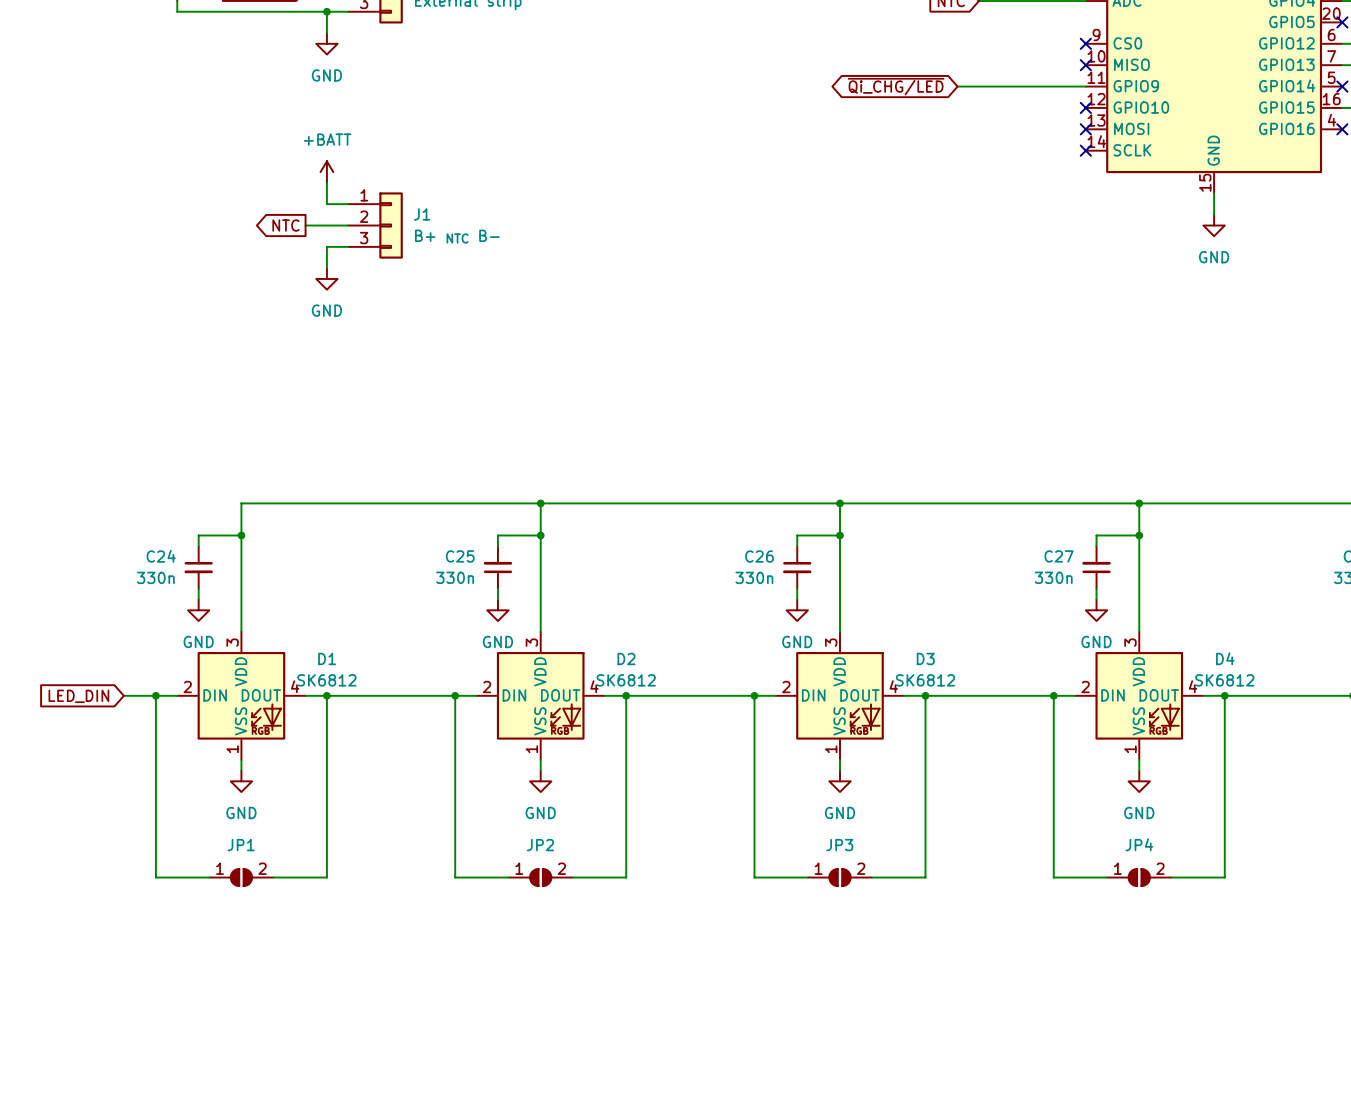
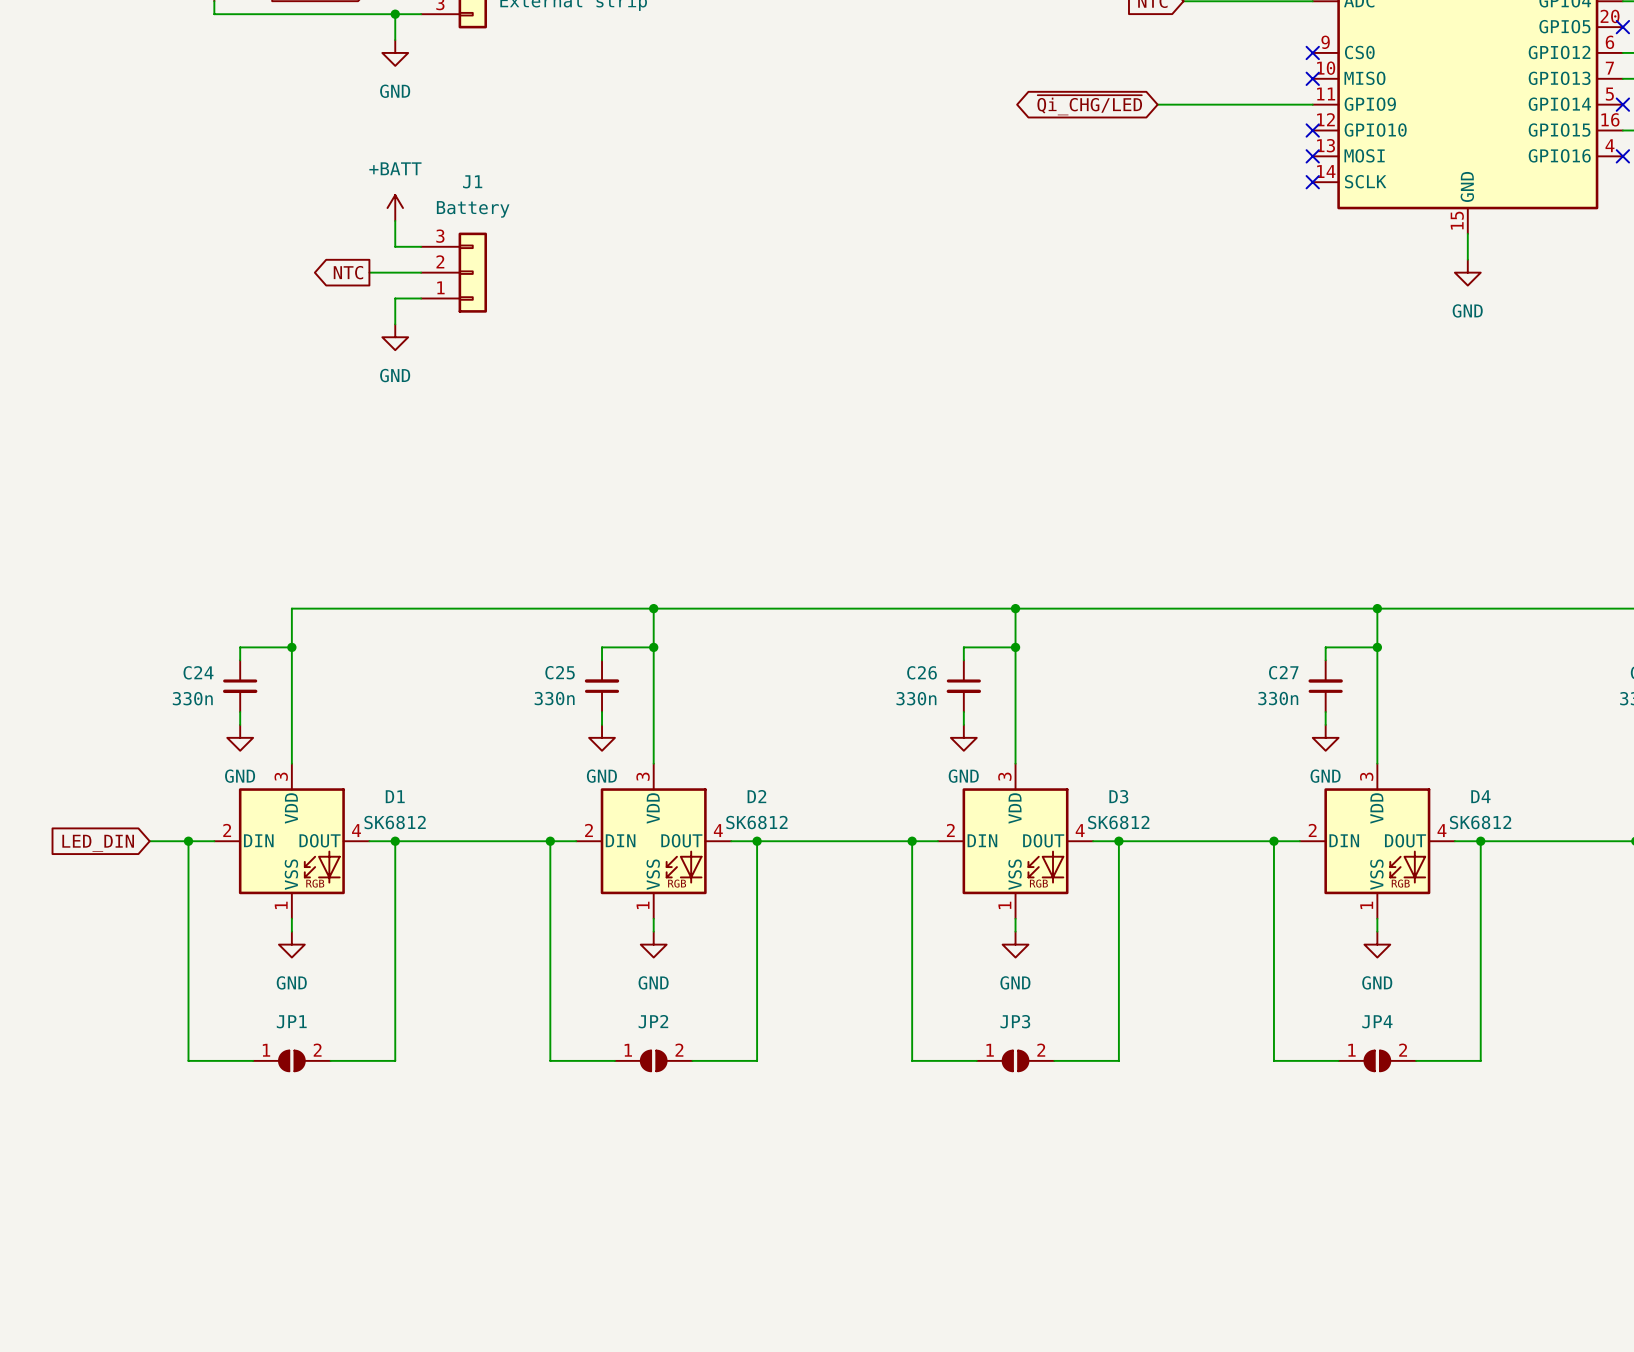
J1 text: none -> Battery (473, 209)
J1 name position: J1 (422, 214) -> J1 (472, 181)
J1 flip: as is (391, 225) -> up-down (472, 272)
J1 text: B+ NTC B- (457, 236) -> none

